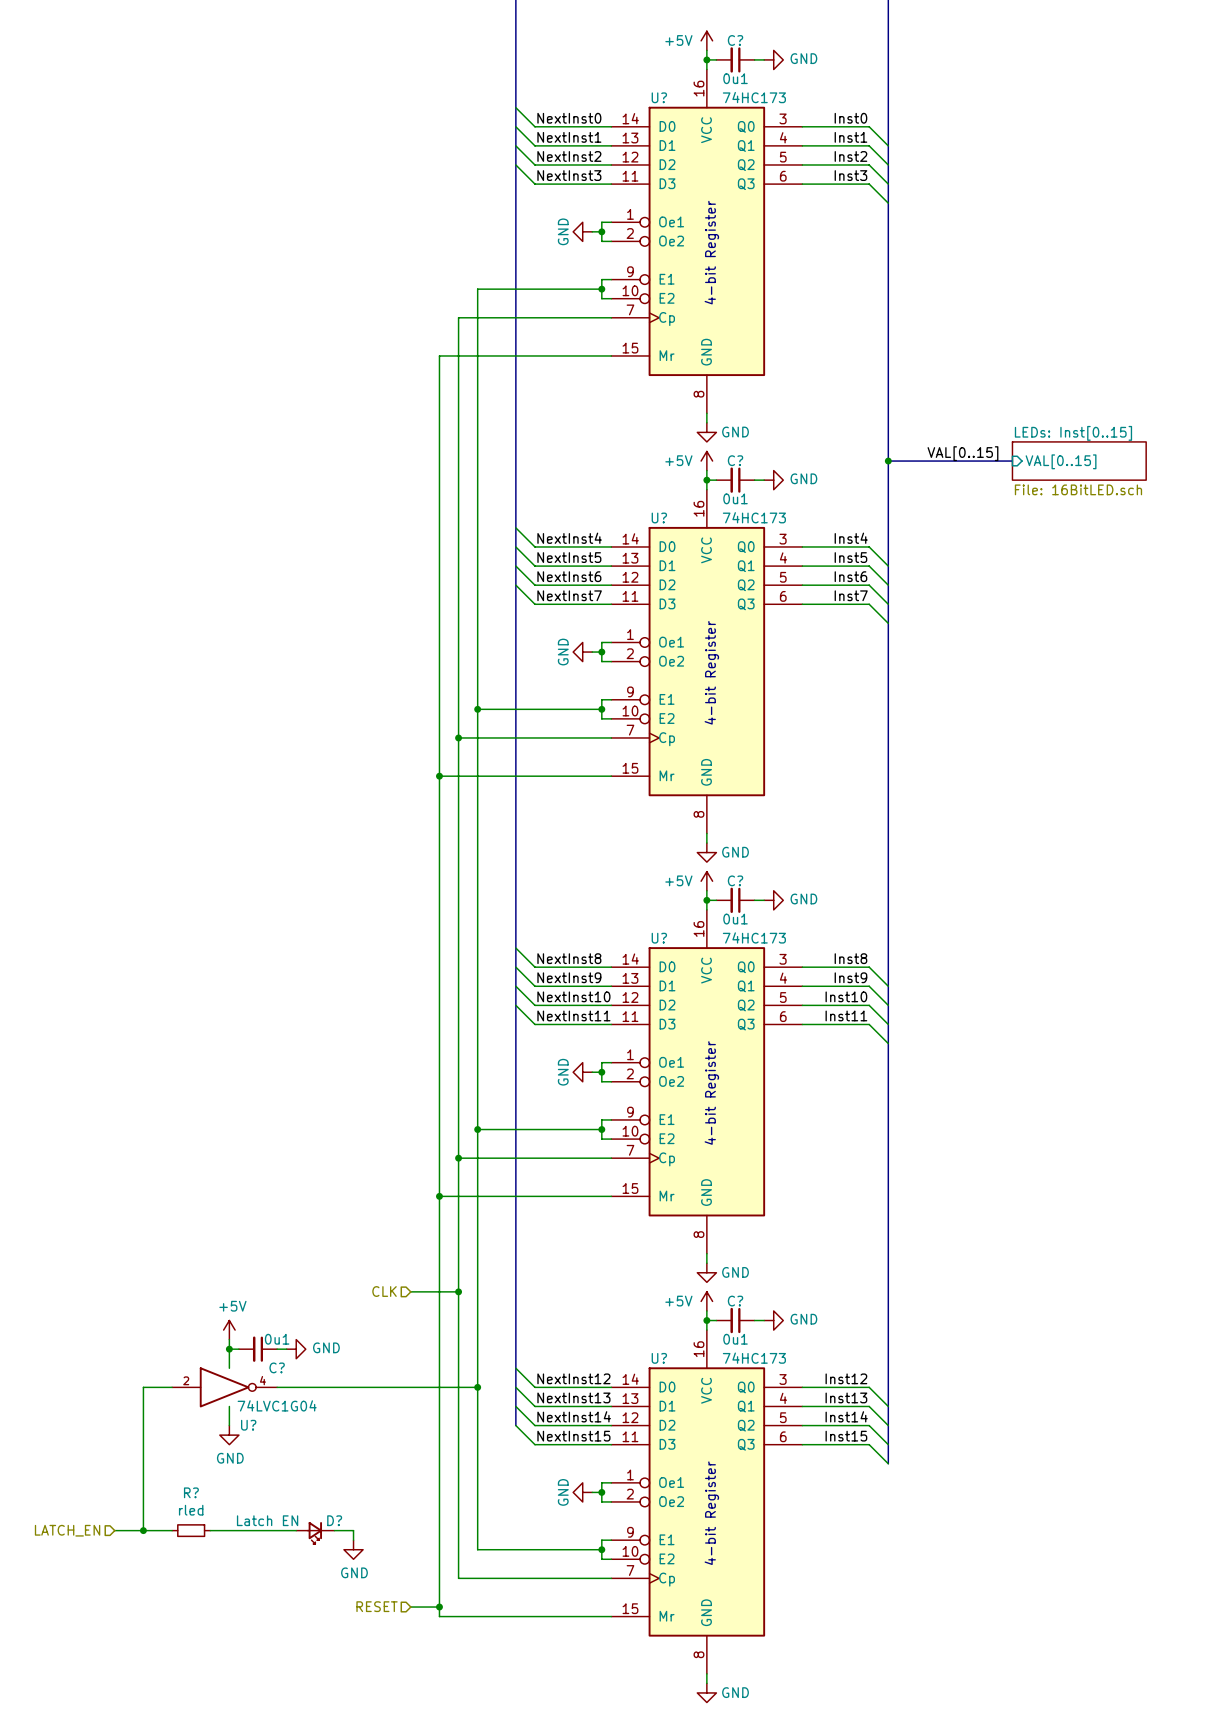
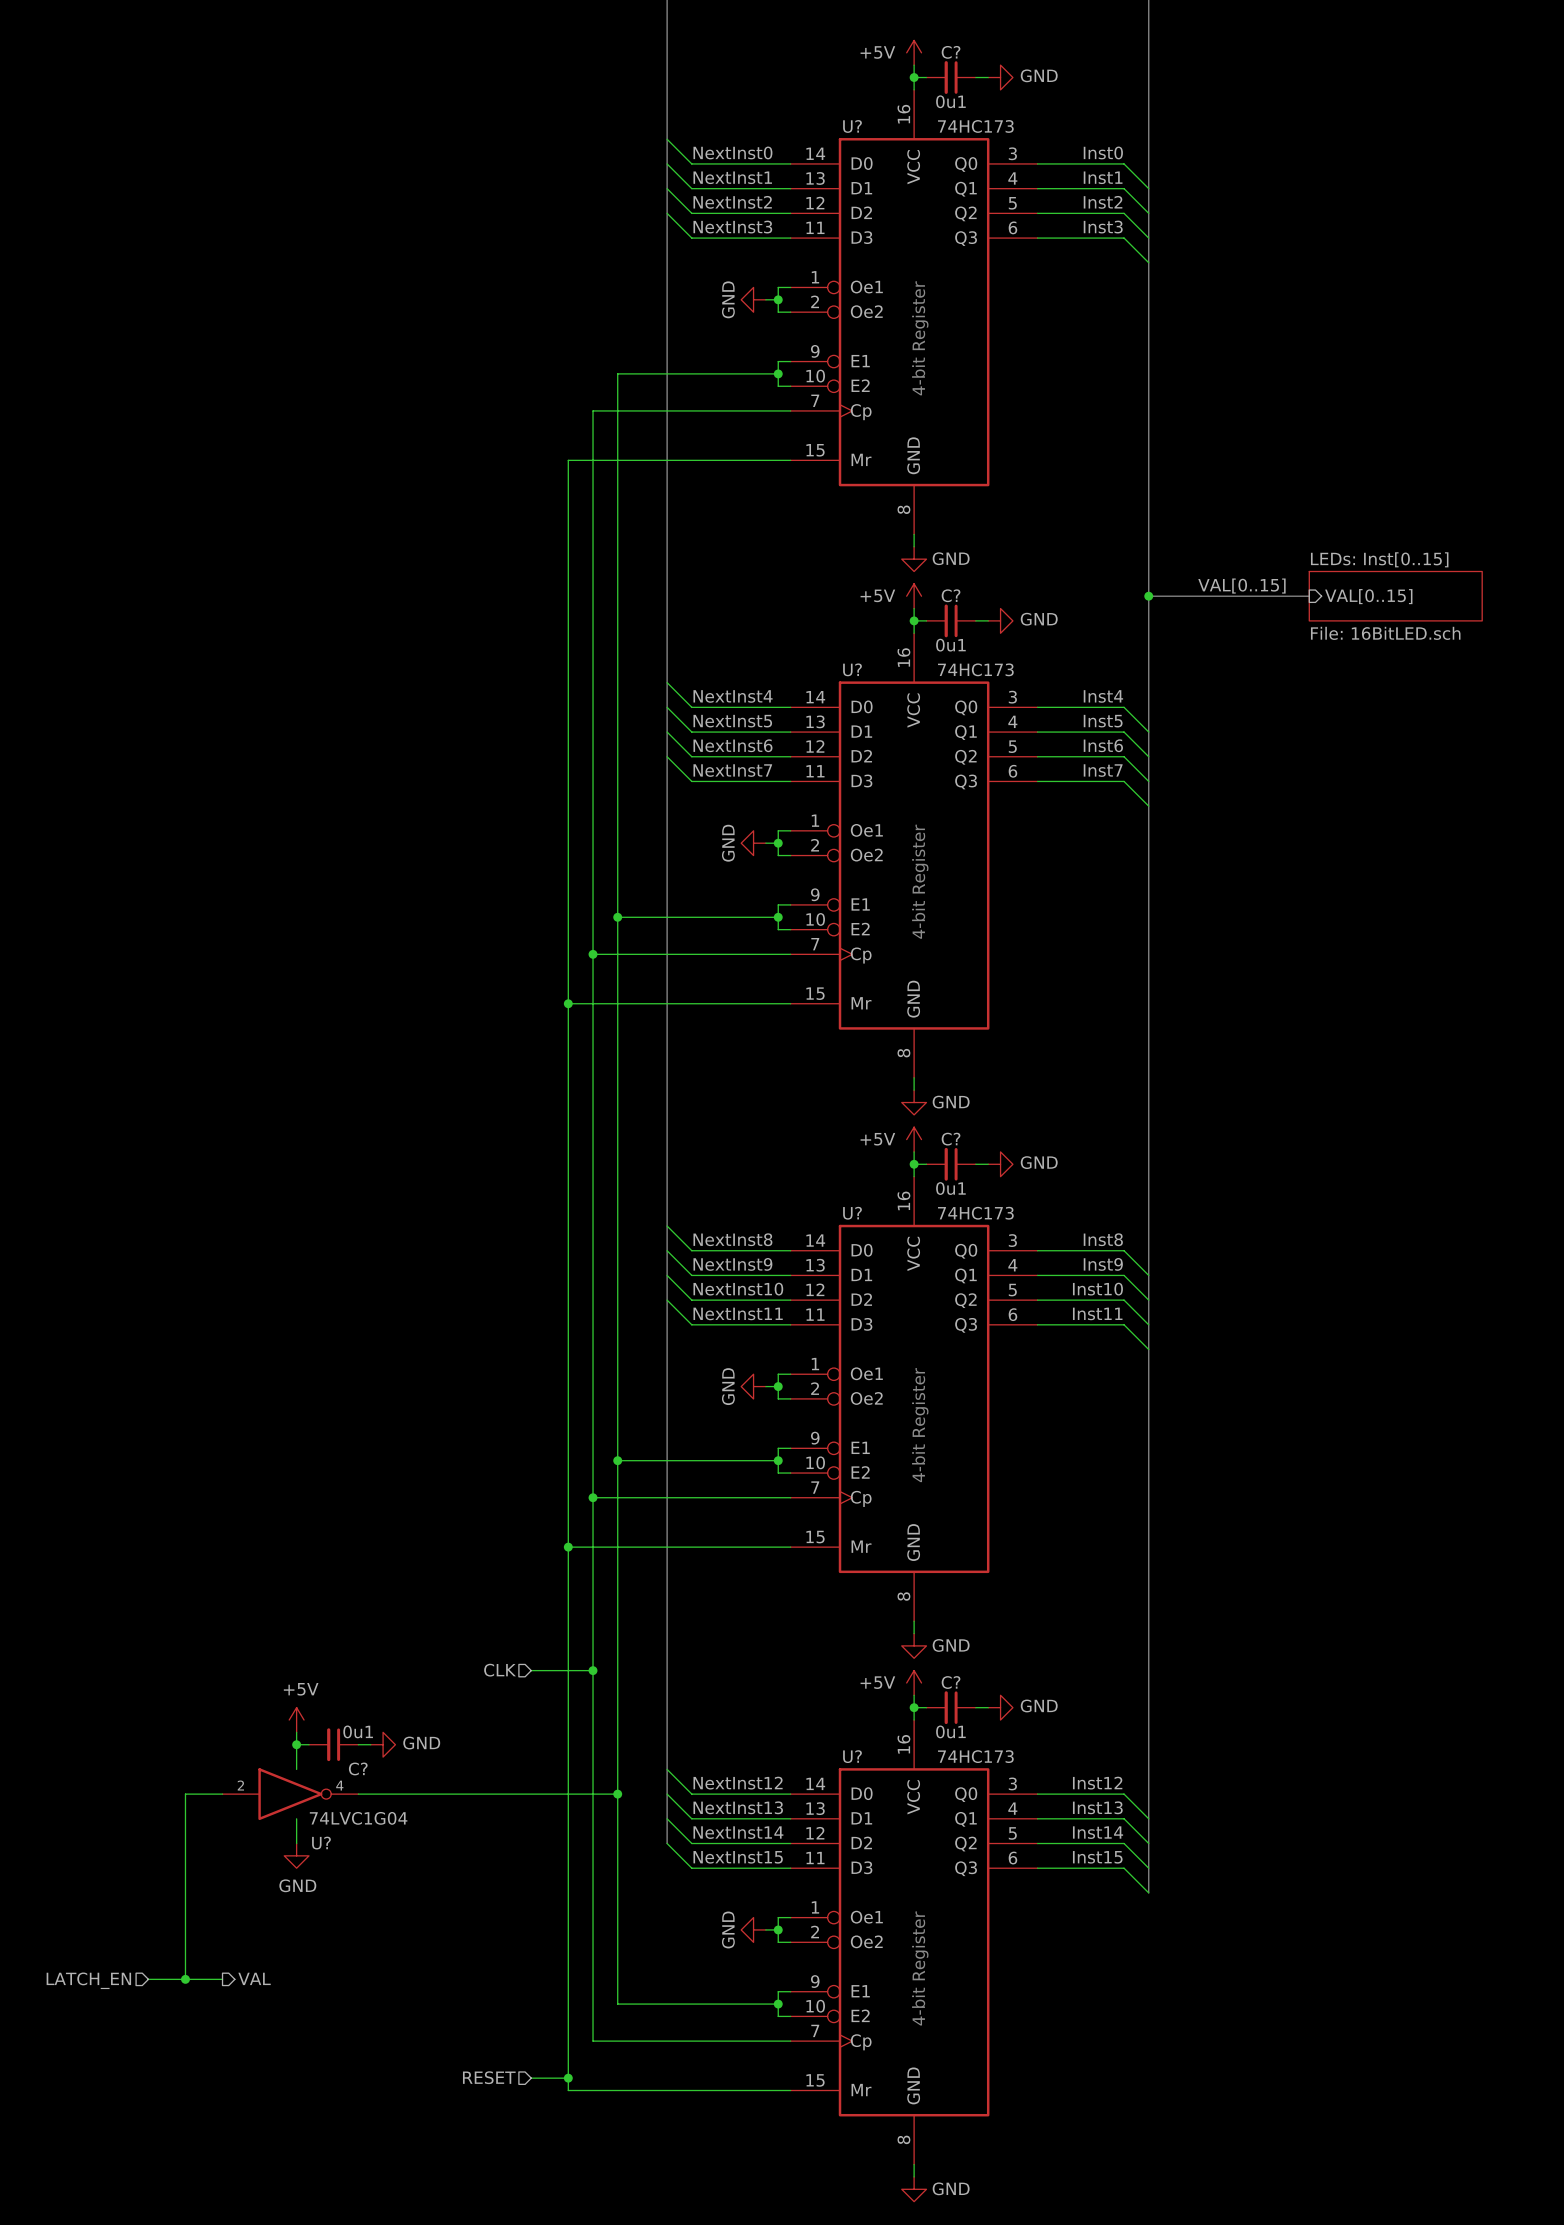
R?: rled (191, 1530) -> none
sheet pin: none -> VAL (254, 1978)
wire: (210, 1530) (296, 1530) -> none
wire: (334, 1530) (353, 1530) (353, 1540) -> none
D?: Latch EN (315, 1533) -> none
power symbol: GND (353, 1549) -> none

